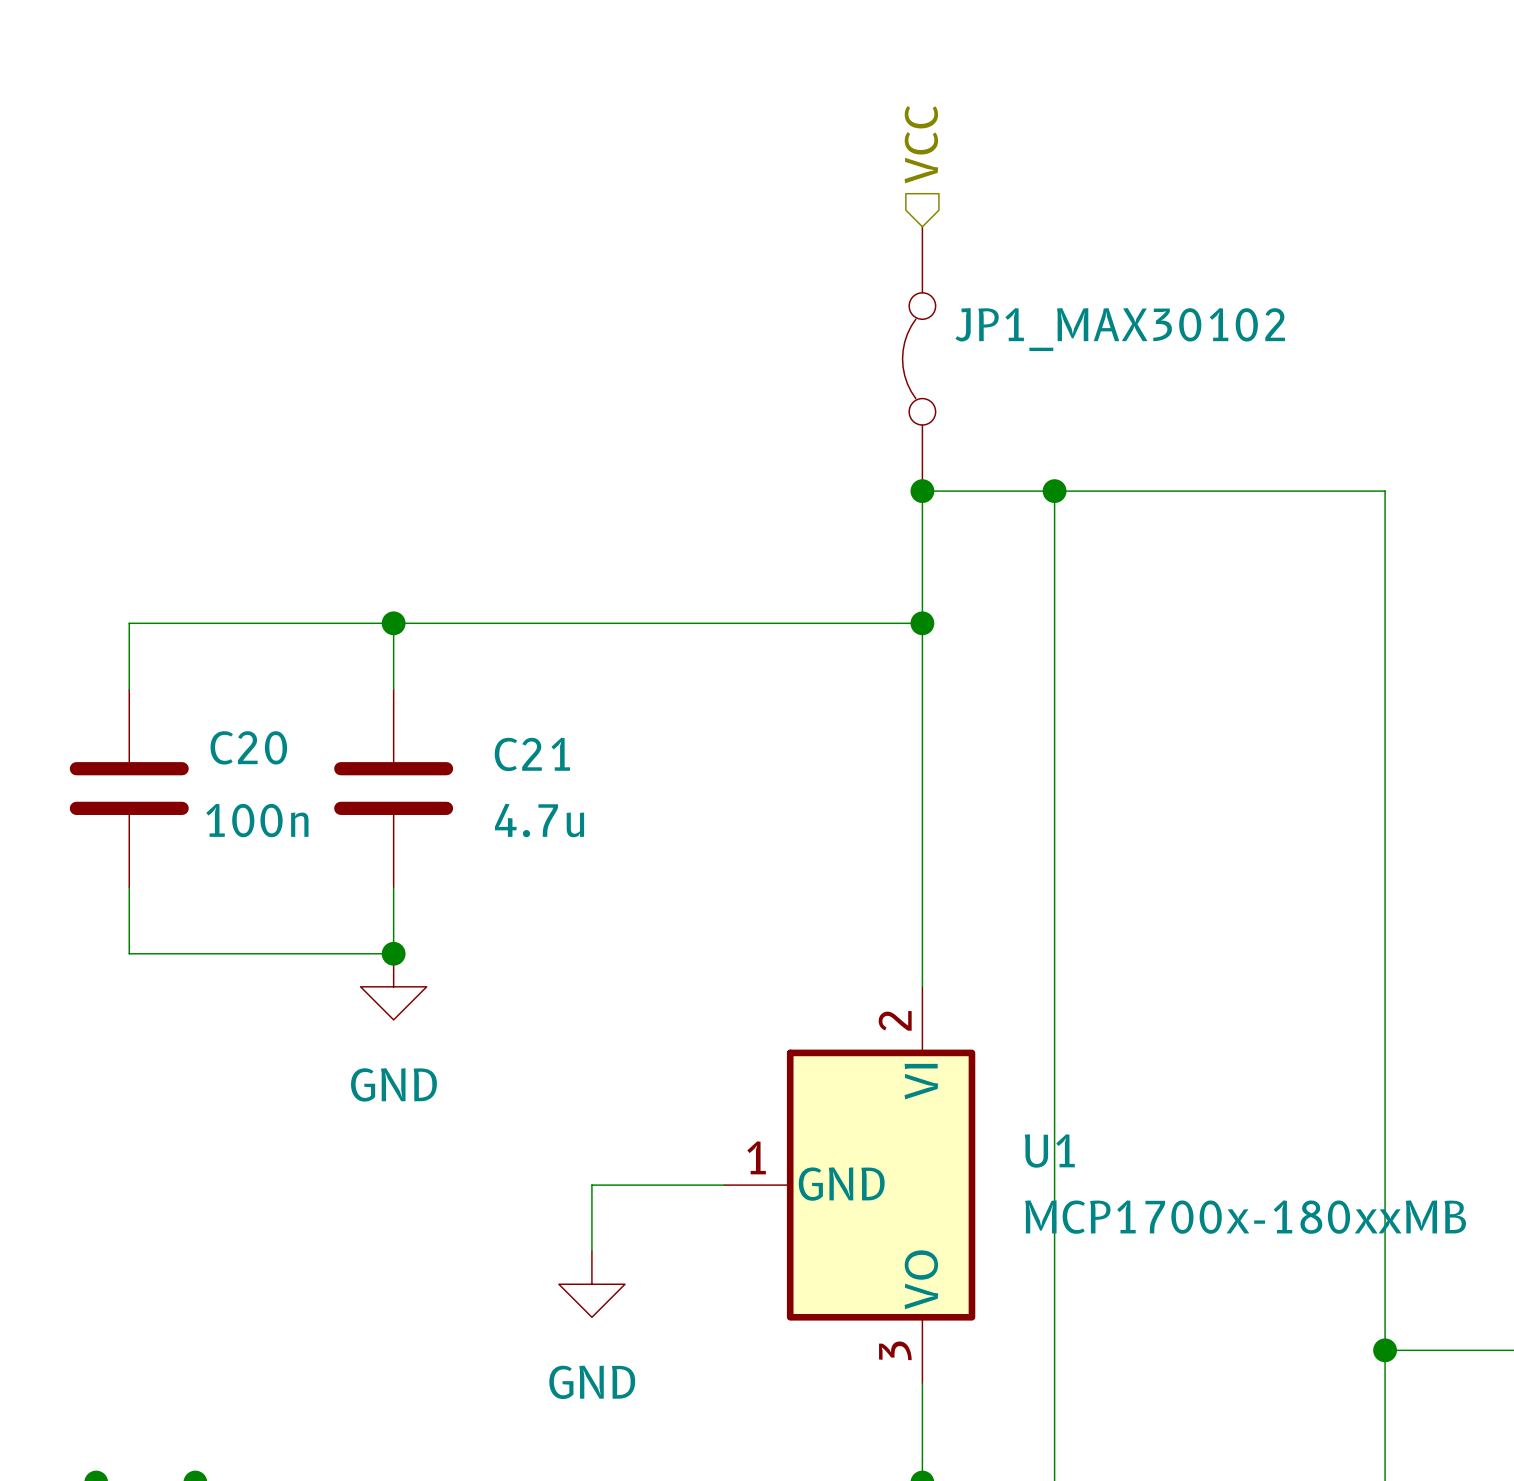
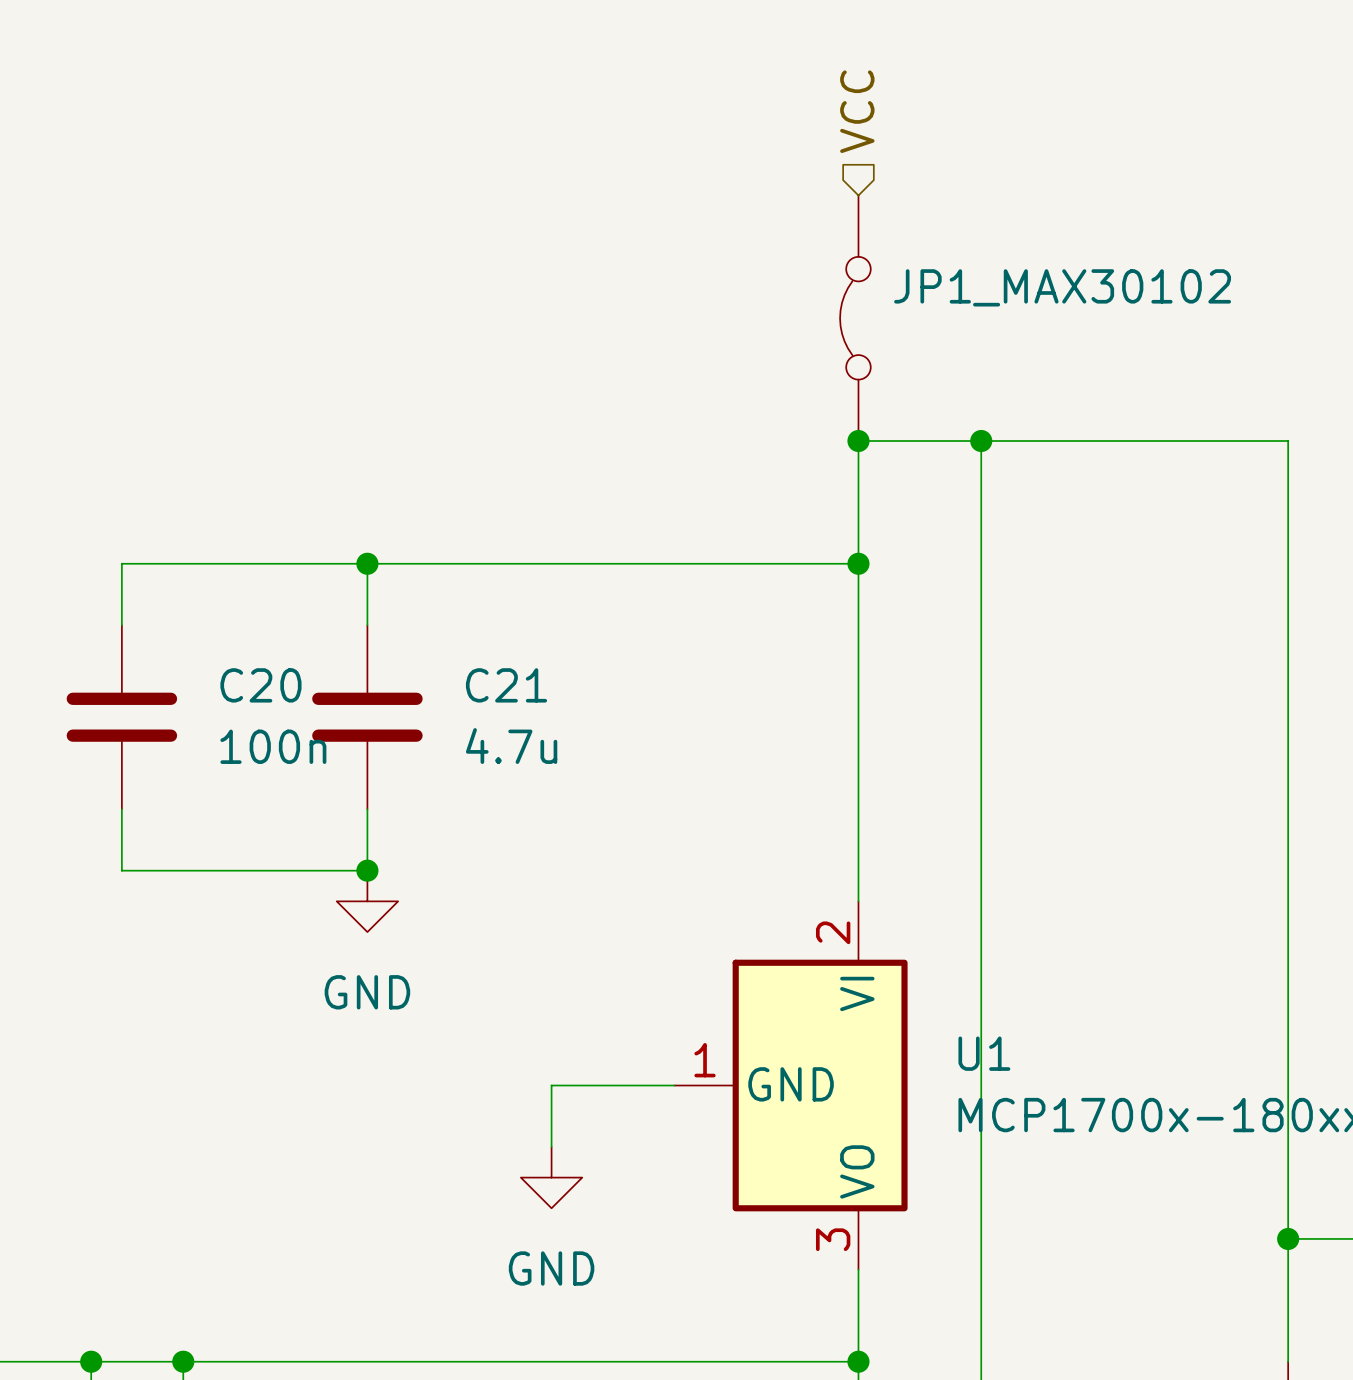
C20 name position: C20 (248, 747) -> C20 (260, 685)
C20 value position: 100n (257, 820) -> 100n (273, 746)

